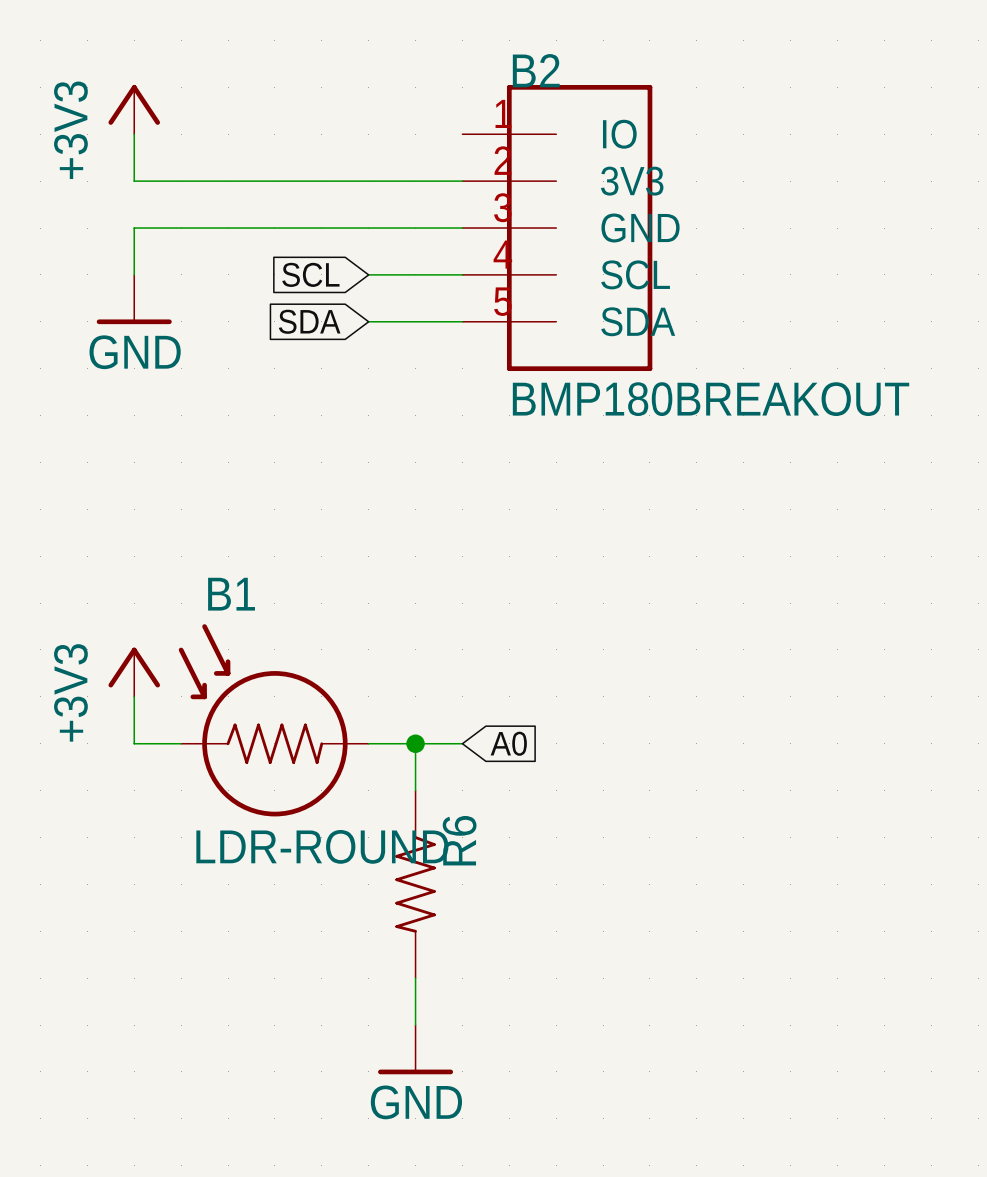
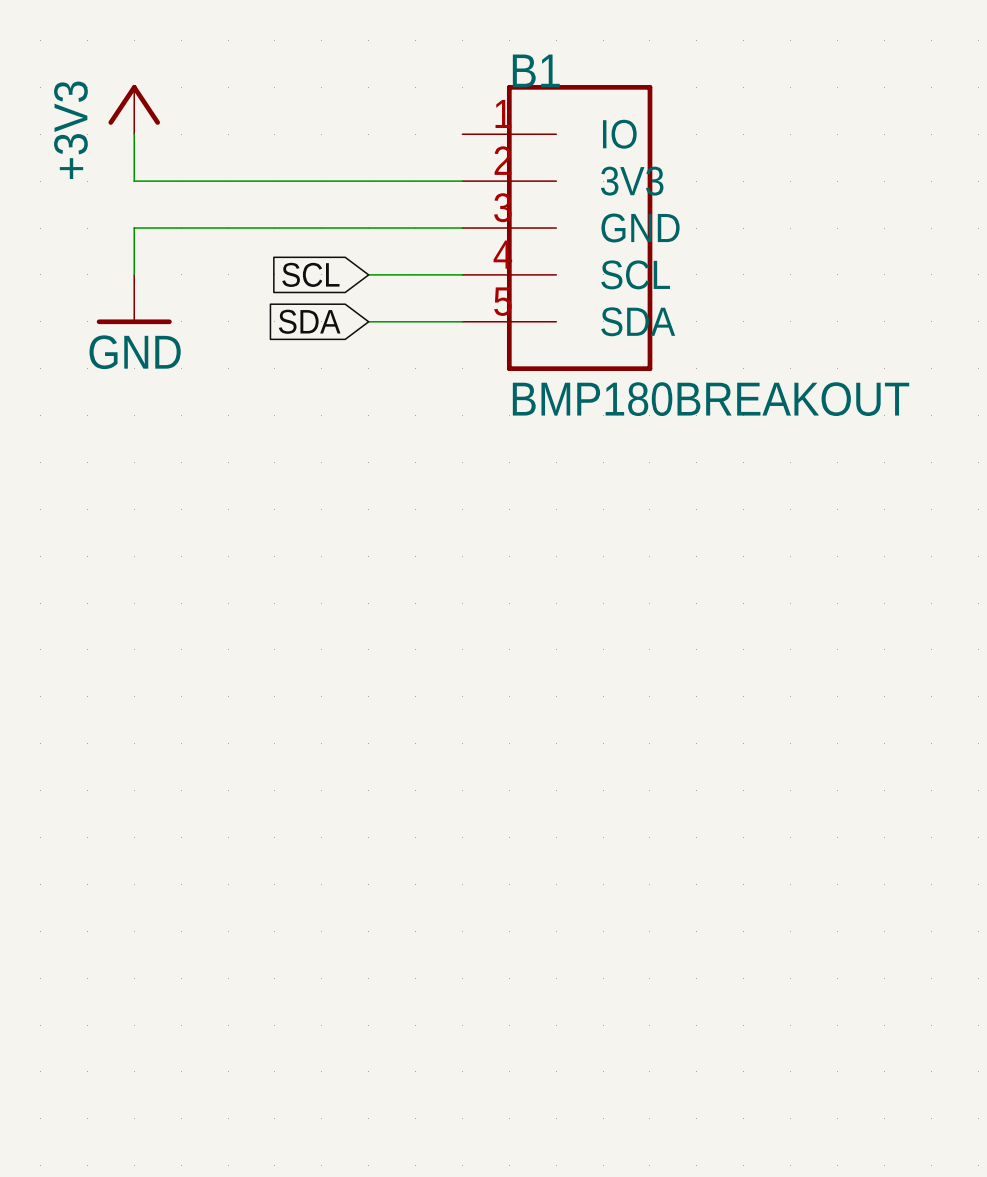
B2 name: B2 (536, 70) -> B1 (536, 70)
power symbol: +3V3 (134, 672) -> none
wire: (134, 696) (134, 743) (181, 743) -> none
B1: LDR-ROUND (273, 720) -> none
wire: (368, 743) (462, 743) -> none
wire: (415, 743) (415, 790) -> none
junction: (415, 743) -> none
global label: A0 (508, 743) -> none
R6: (415, 884) -> none
wire: (415, 978) (415, 1025) -> none
power symbol: GND (415, 1049) -> none

